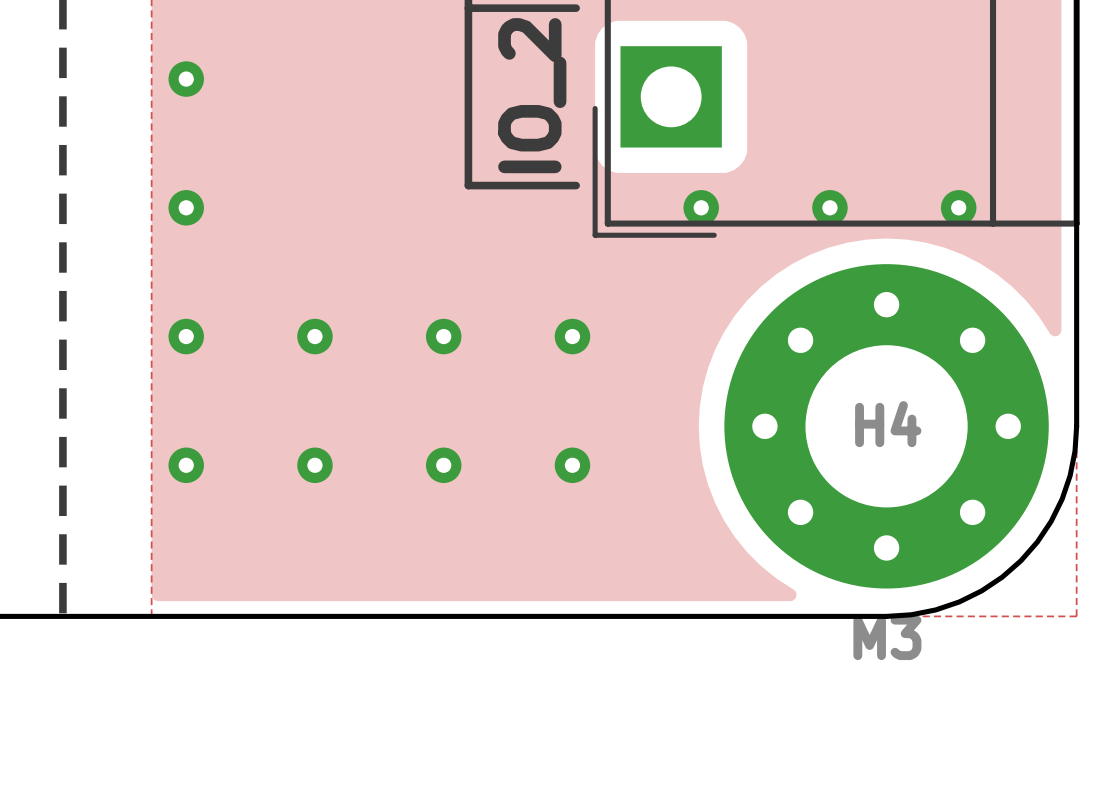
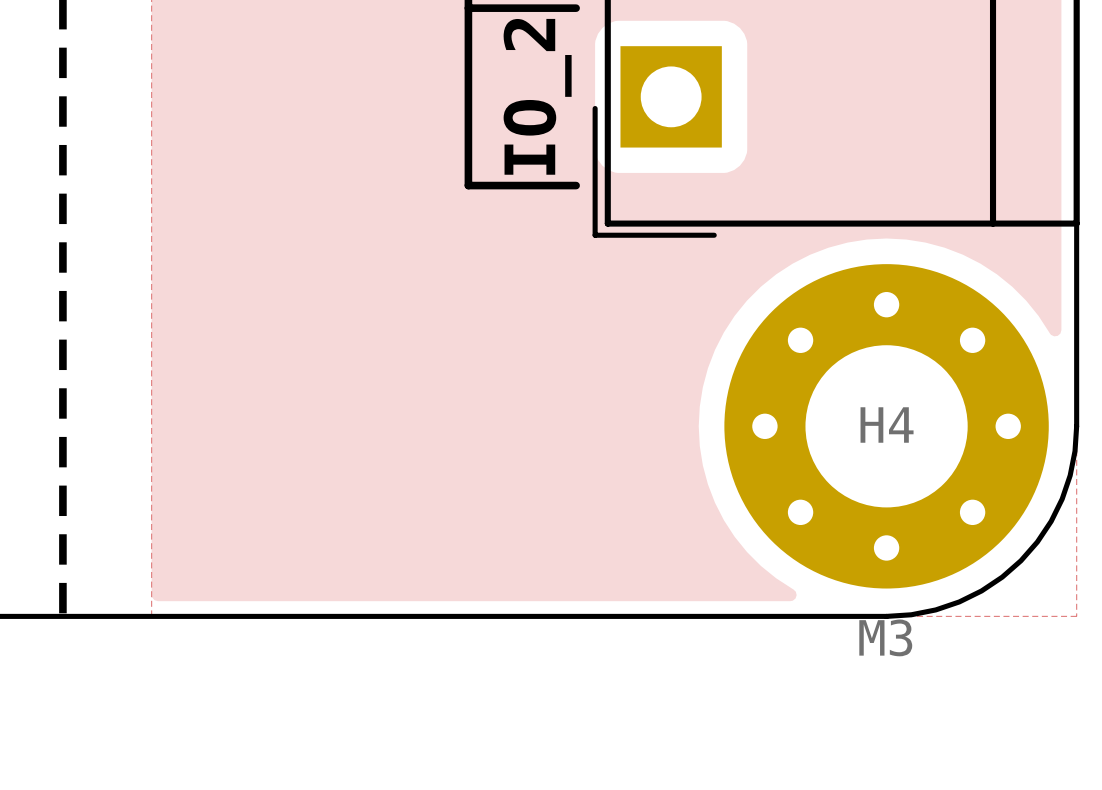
via: (186, 79) -> none
via: (186, 207) -> none
via: (701, 207) -> none
via: (829, 207) -> none
via: (958, 207) -> none
via: (186, 336) -> none
via: (314, 336) -> none
via: (443, 336) -> none
via: (572, 336) -> none
via: (186, 465) -> none
via: (314, 465) -> none
via: (443, 465) -> none
via: (572, 465) -> none

